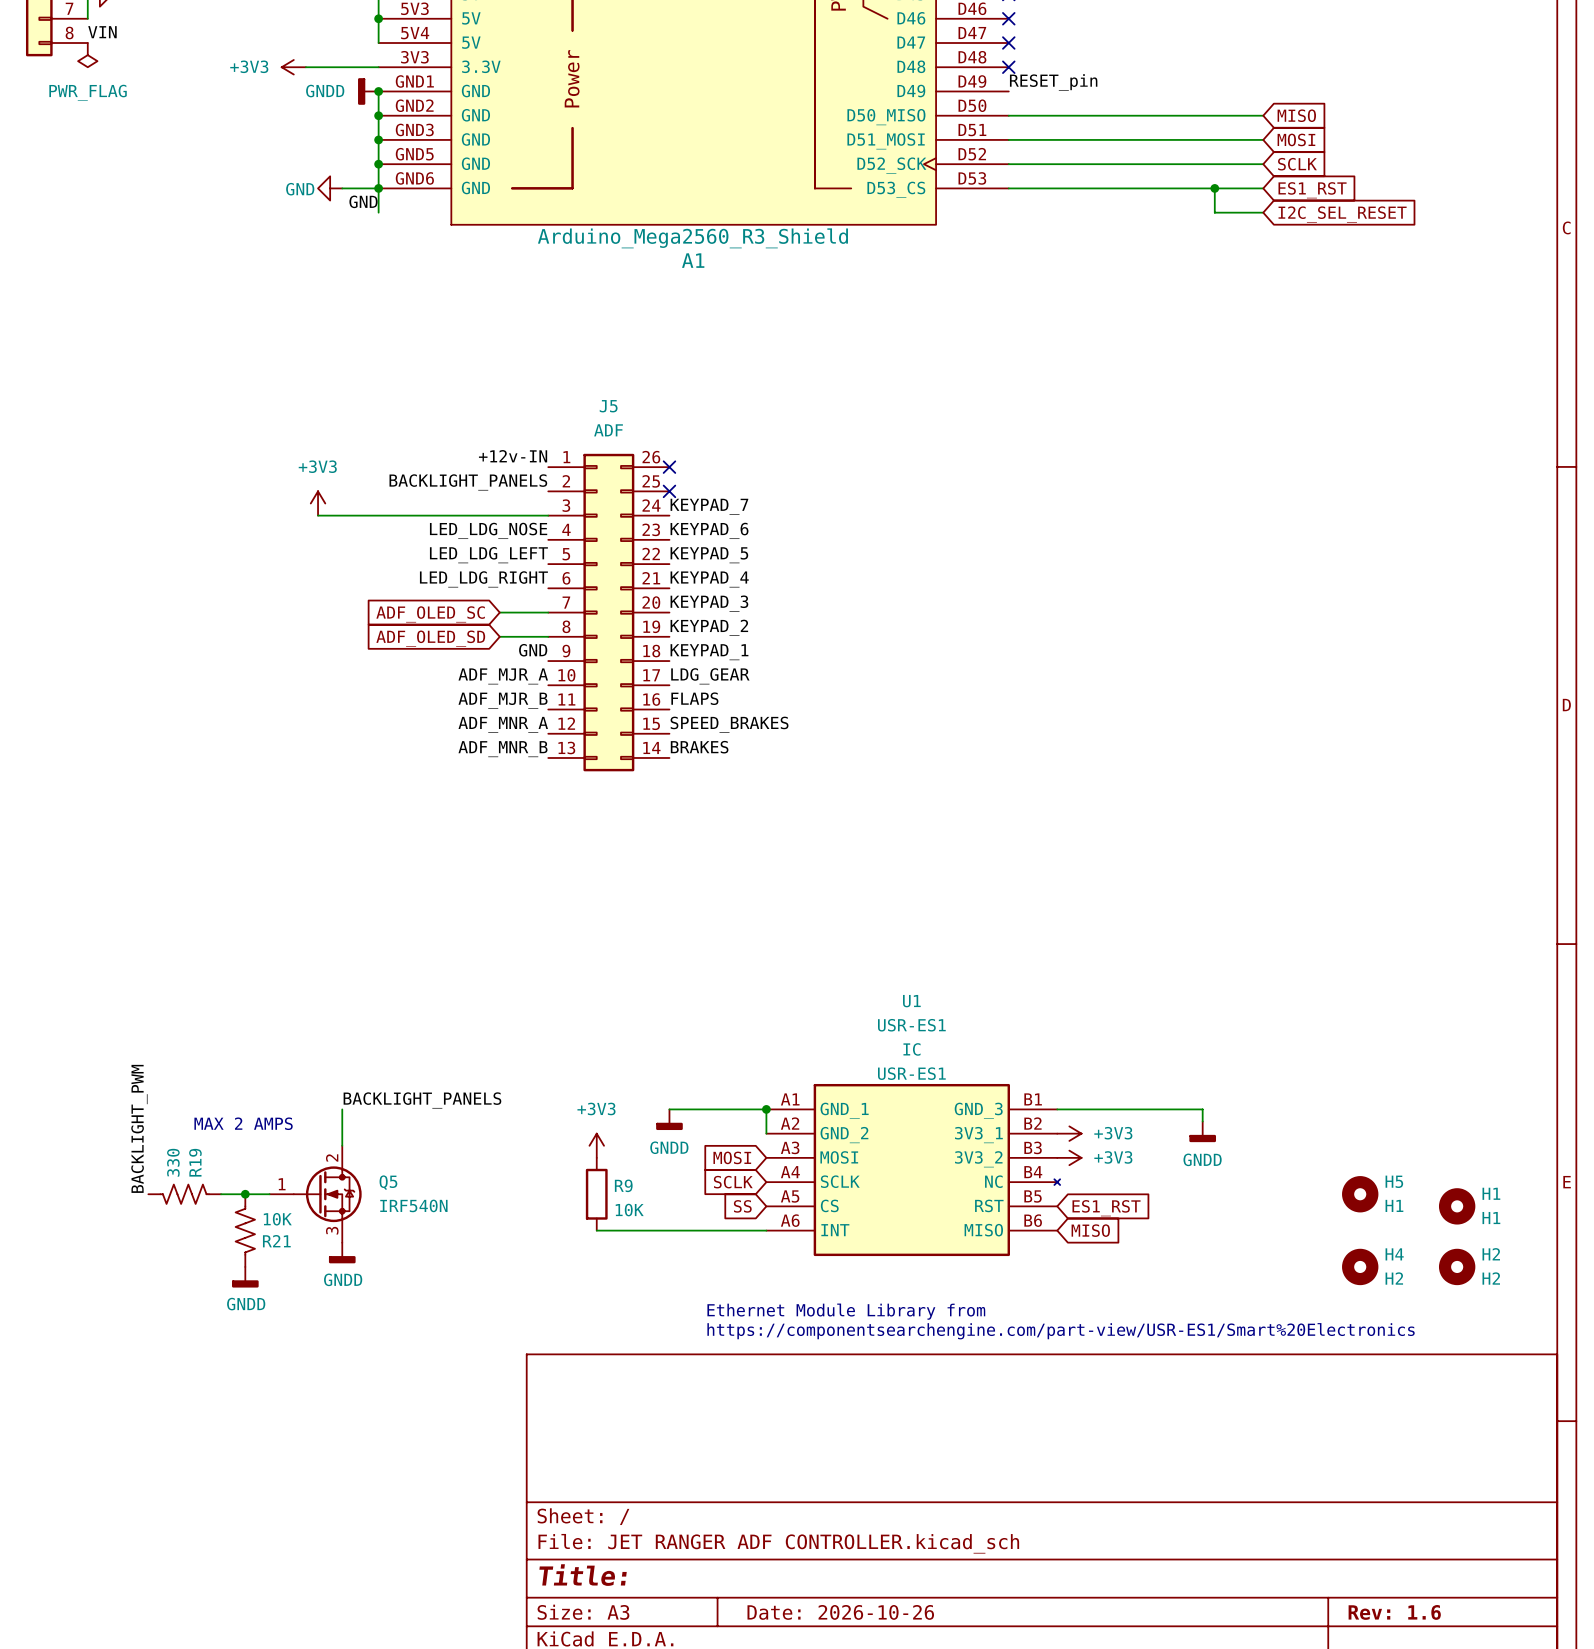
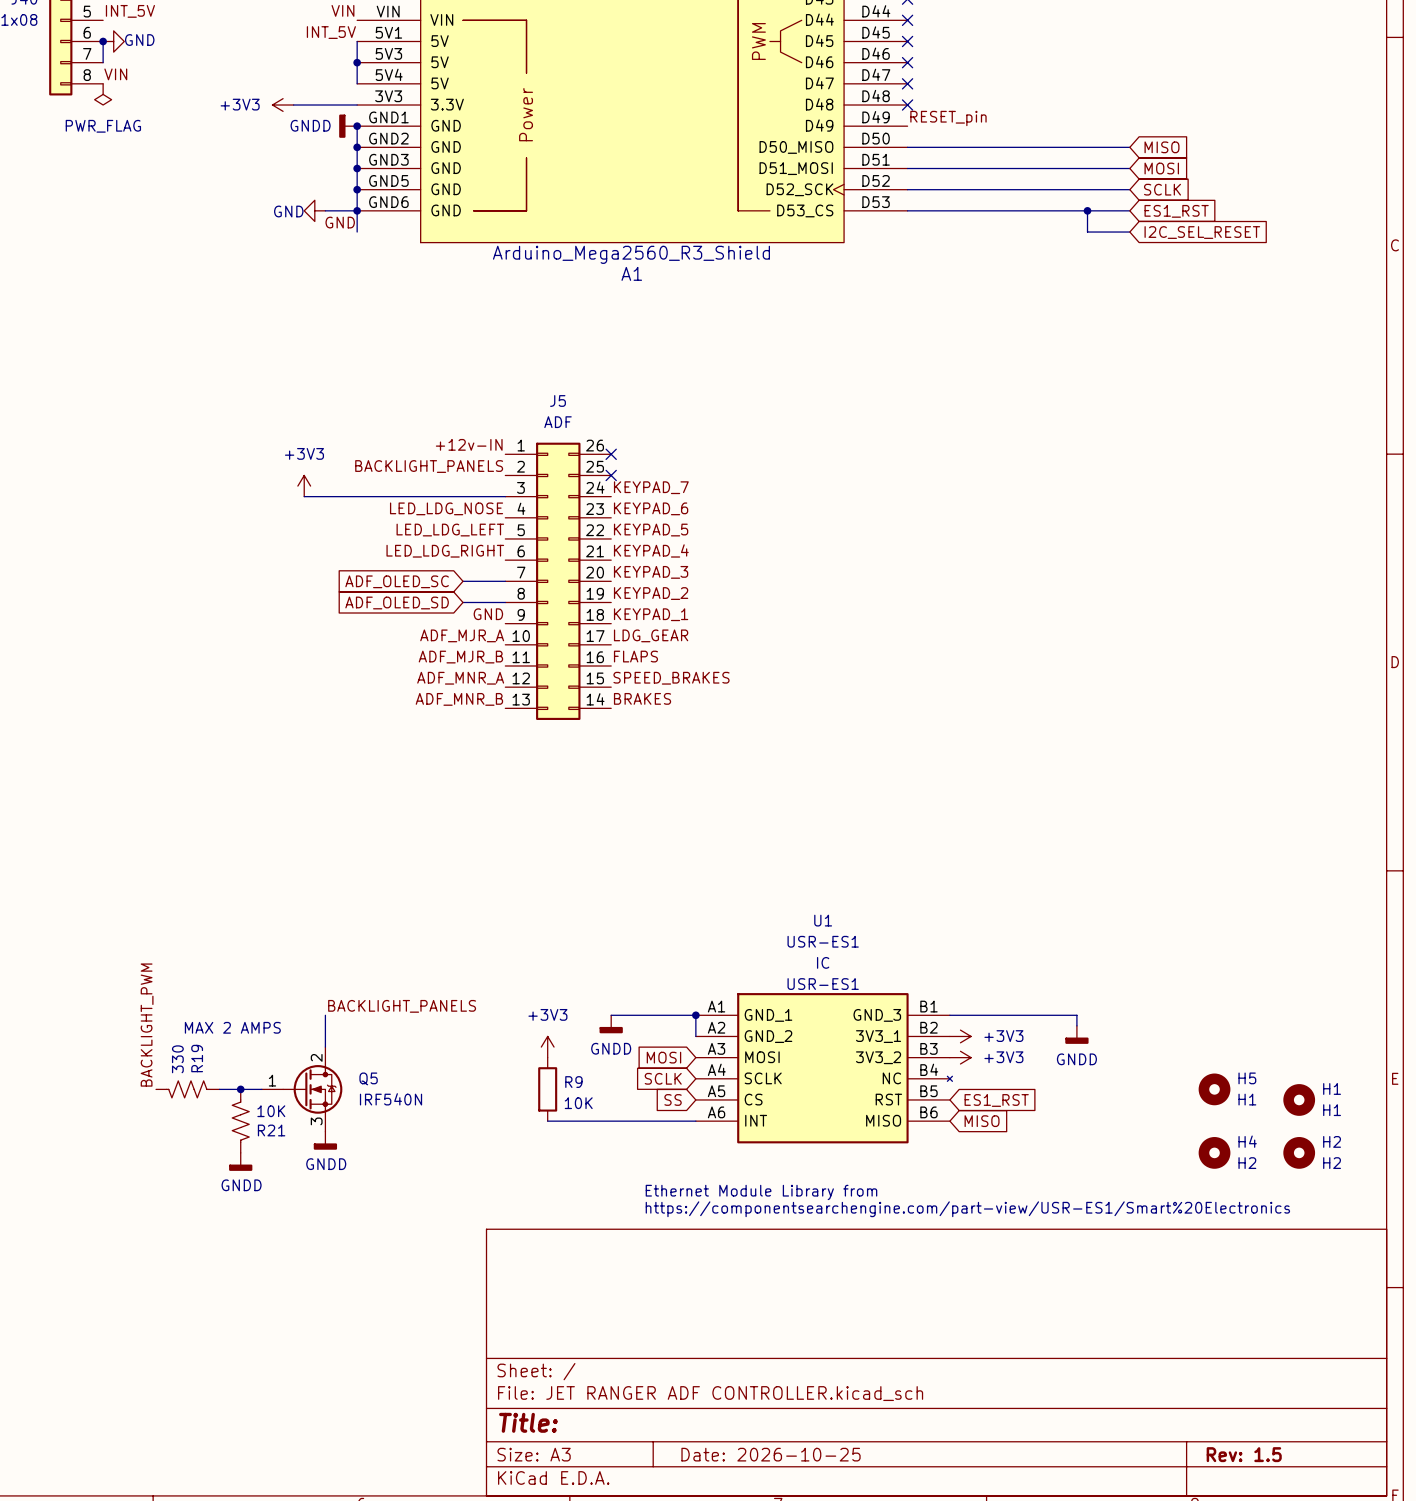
title block: Date: 2026-10-26 (840, 1612) -> Date: 2026-10-25 (771, 1454)
title block: Rev: 1.6 (1394, 1612) -> Rev: 1.5 (1244, 1454)

